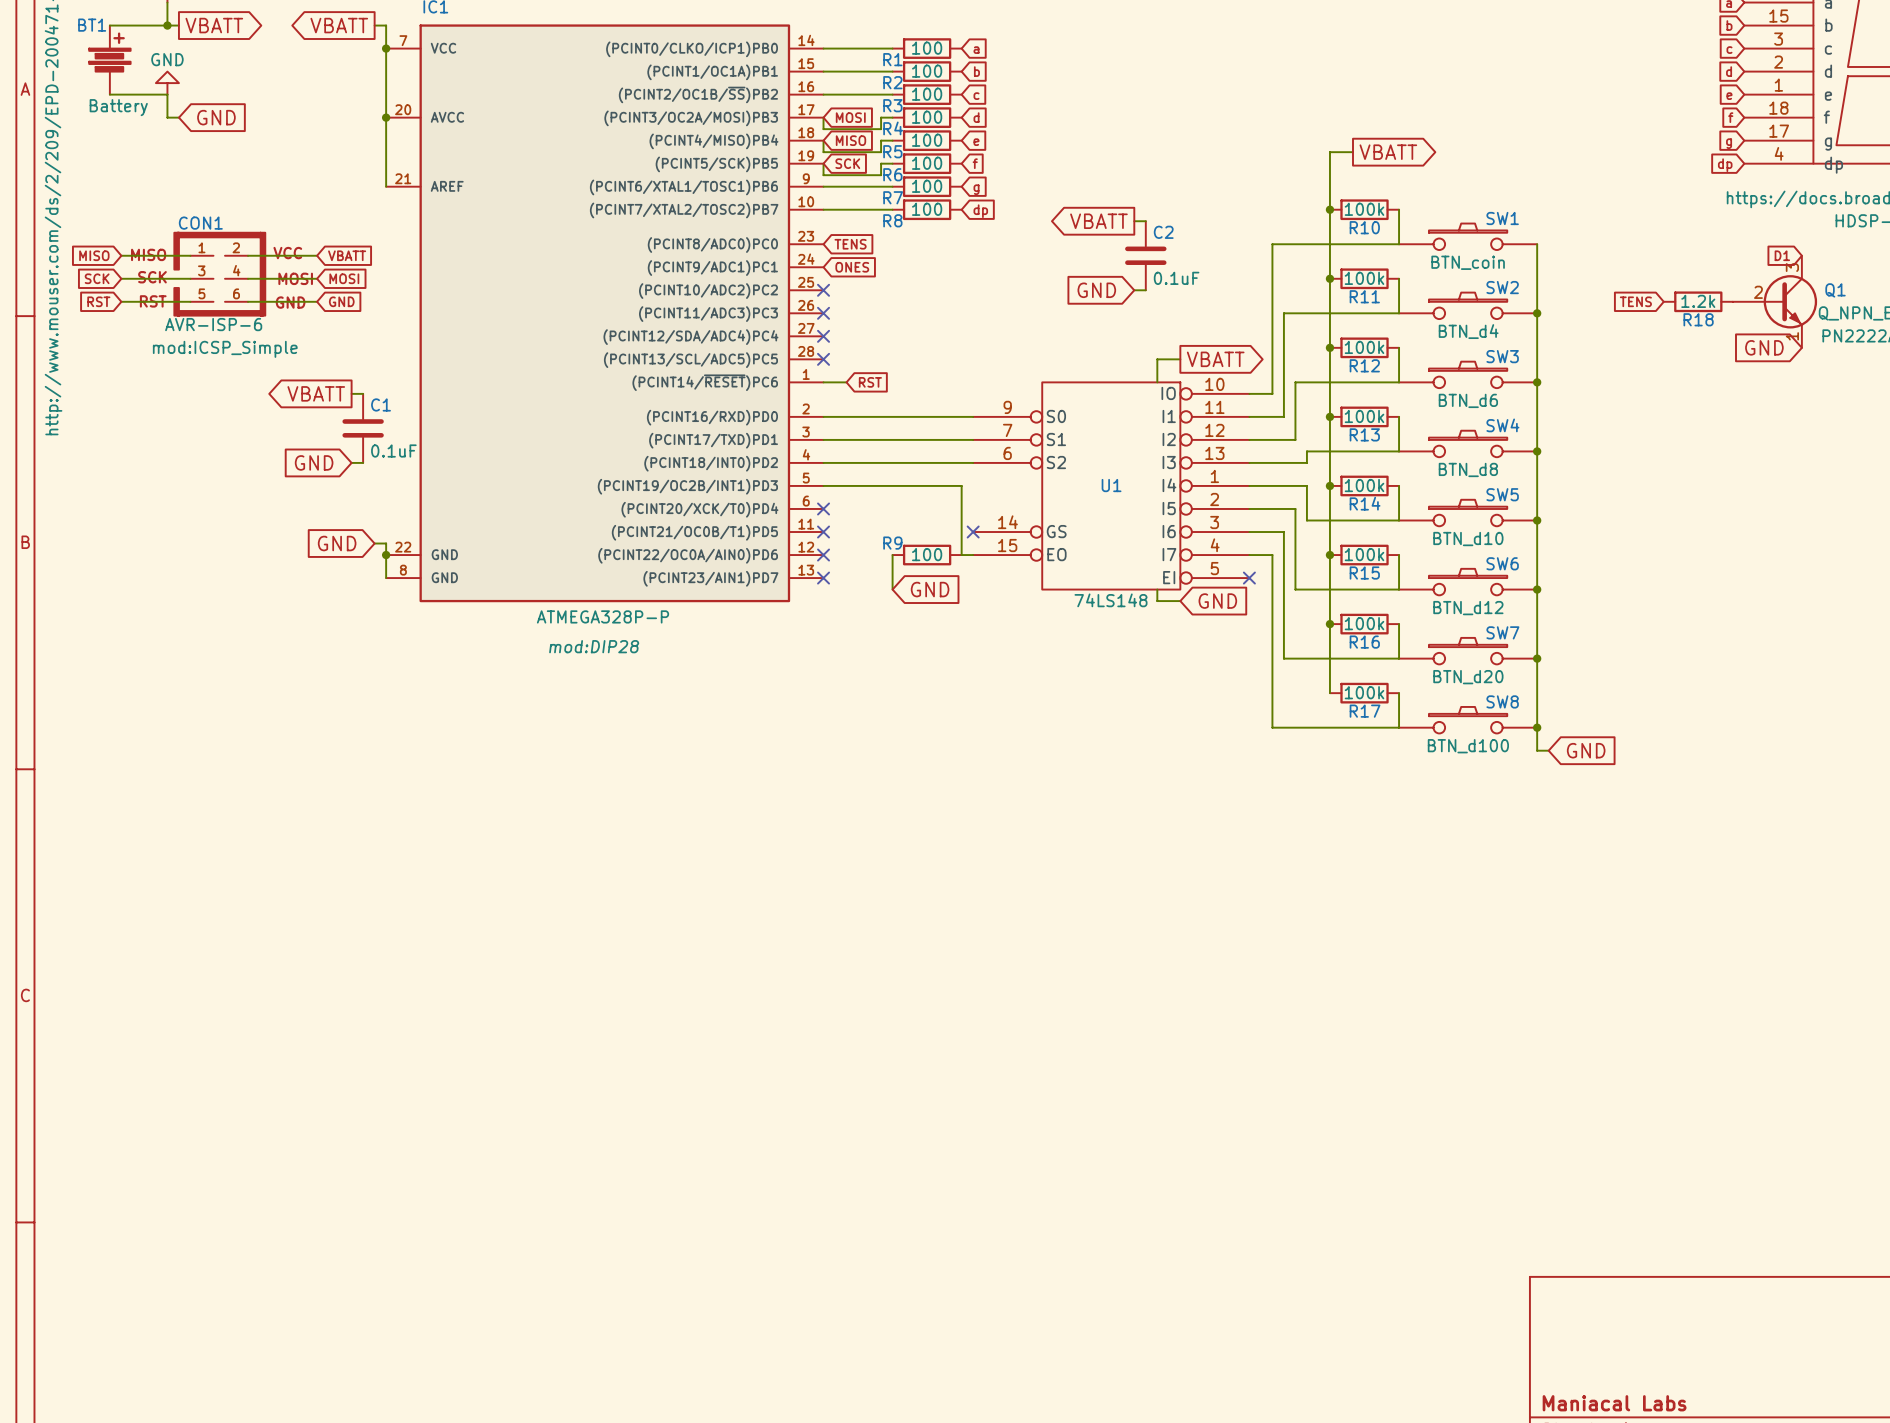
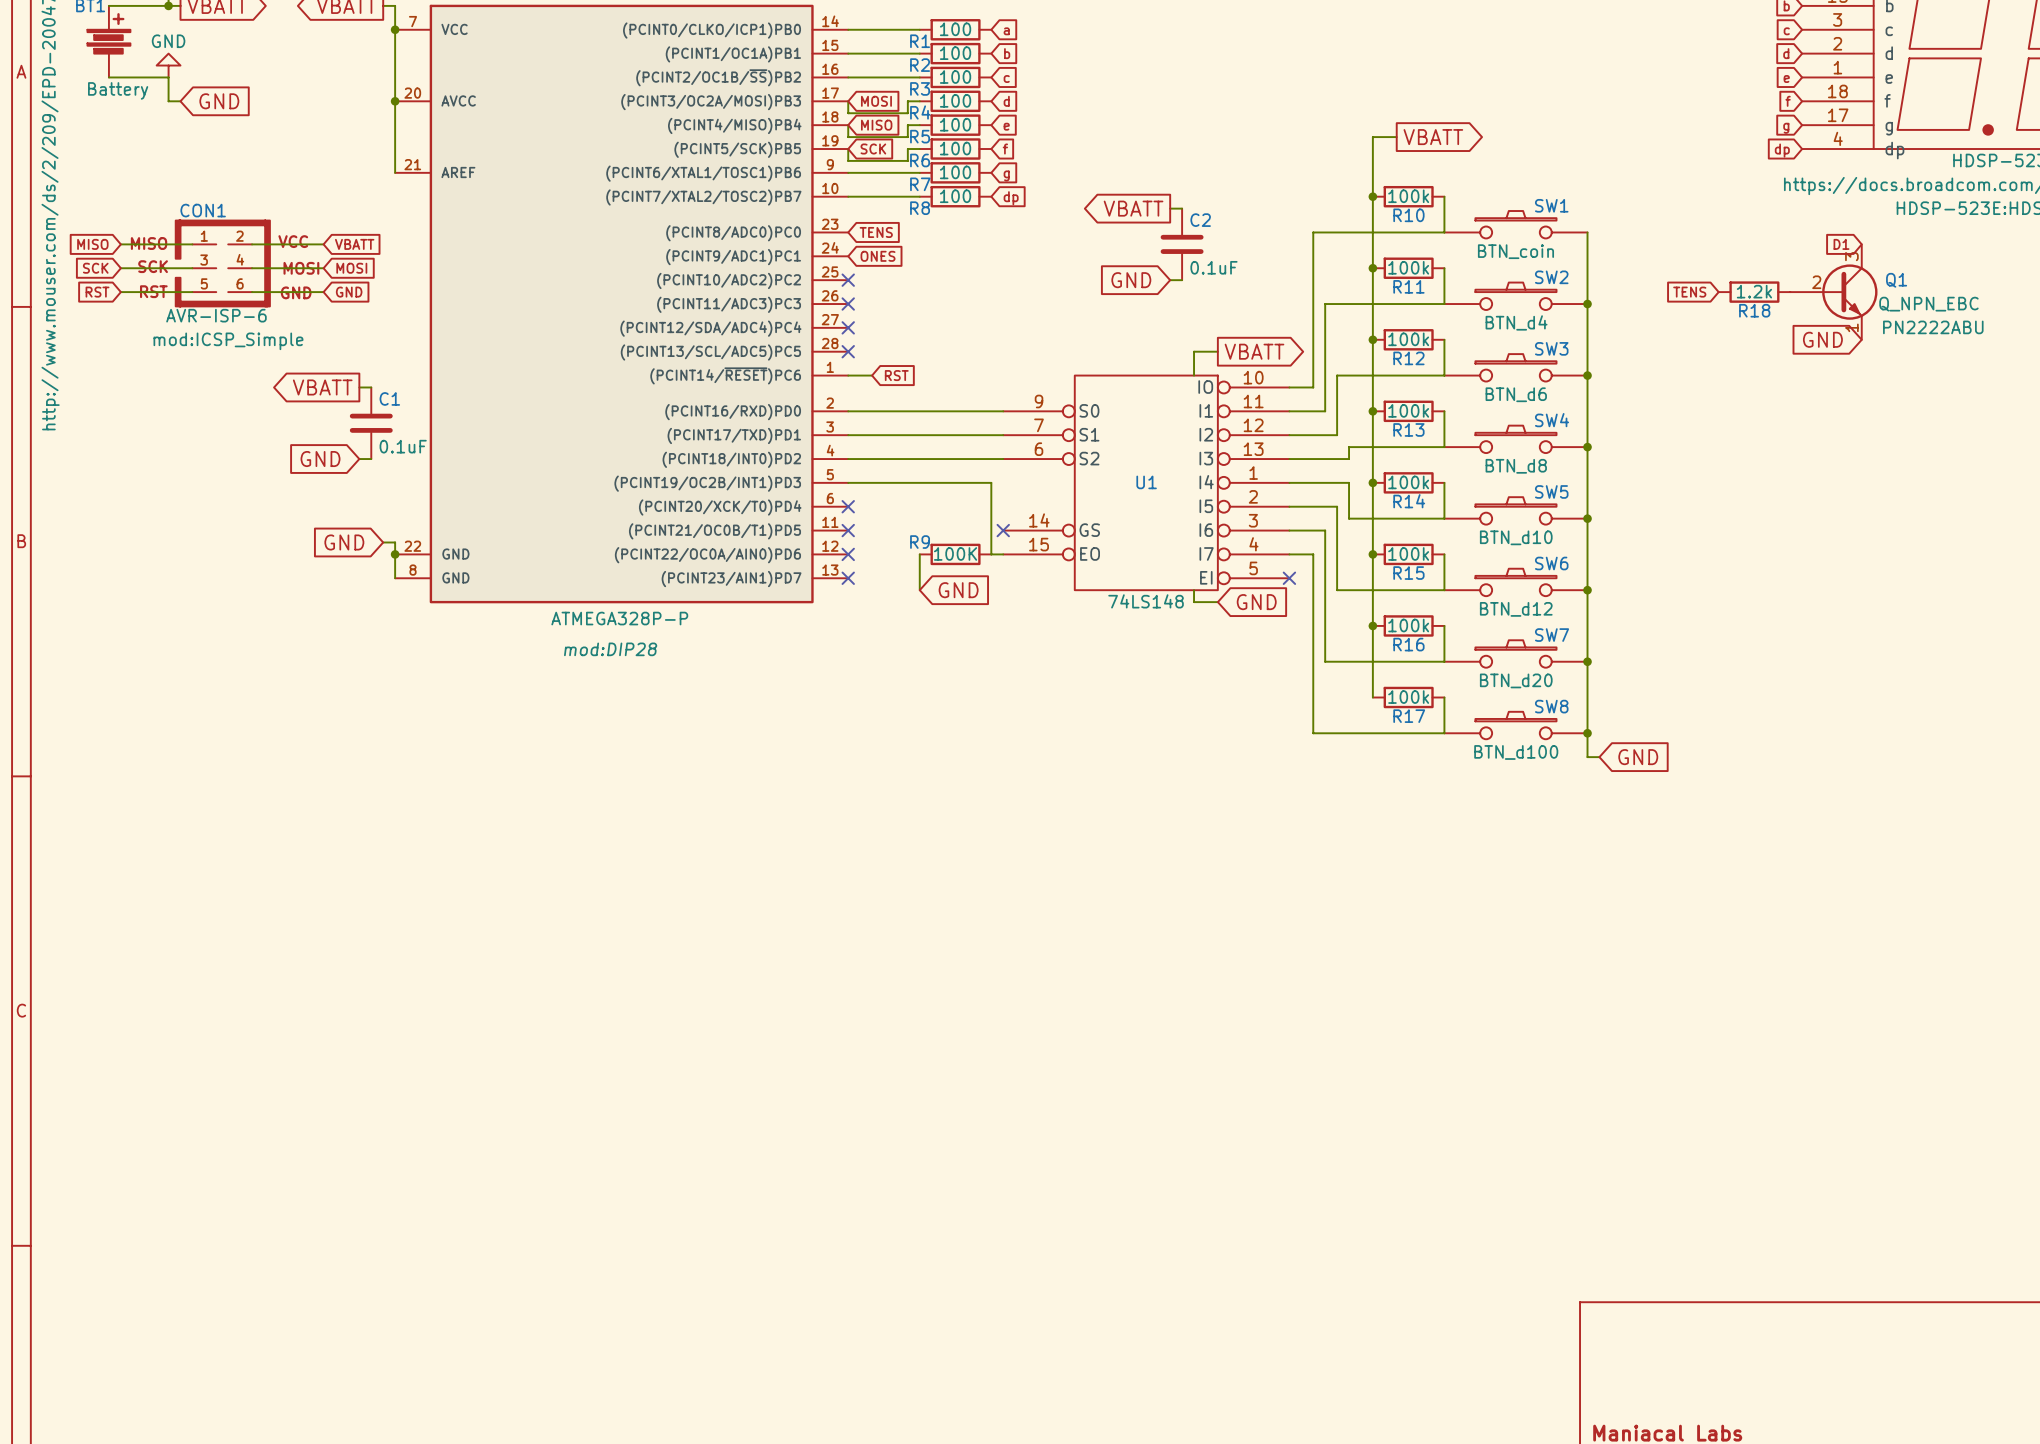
R9 value: 100 (927, 554) -> 100K (955, 553)

